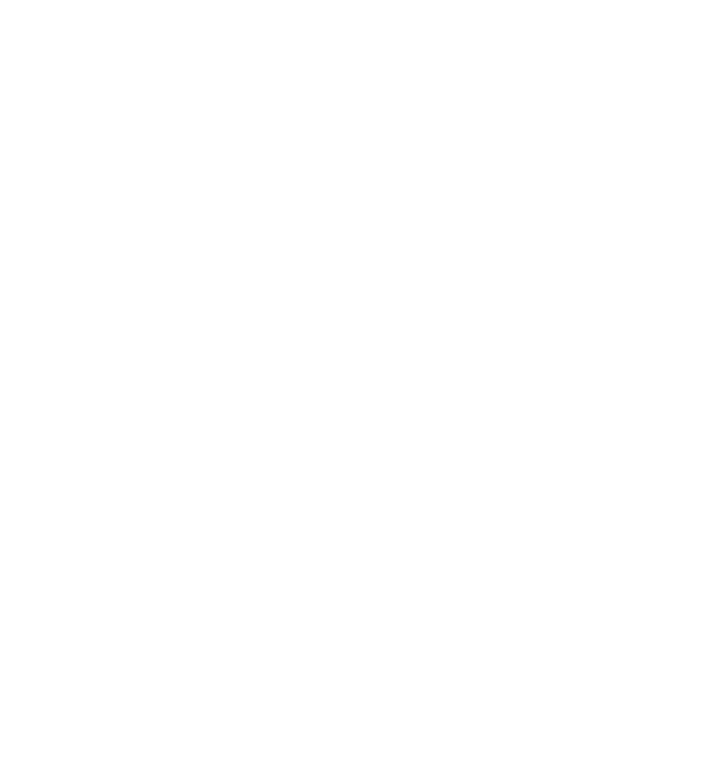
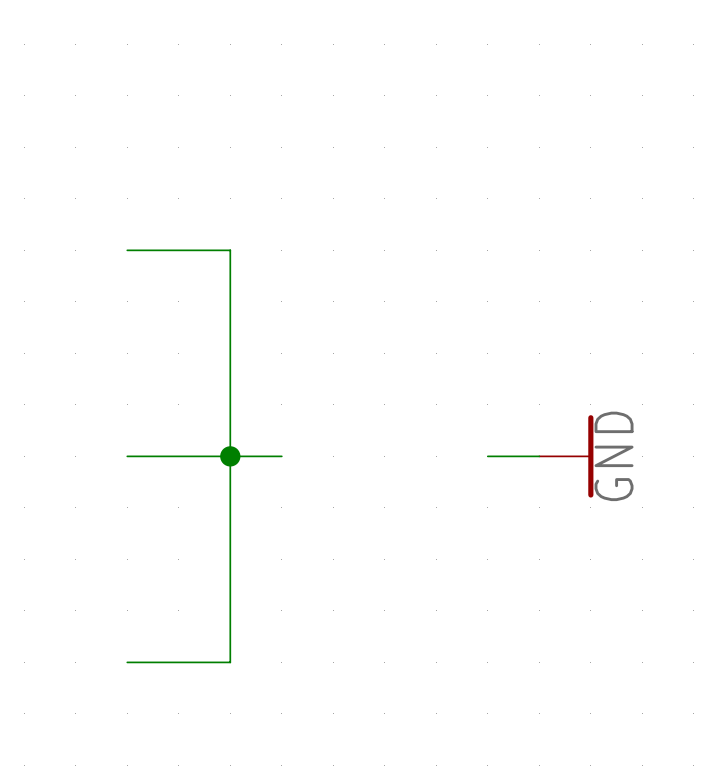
wire: none -> (127, 250) (230, 250) (230, 662) (127, 662)
wire: none -> (127, 456) (281, 456)
junction: none -> (230, 456)
wire: none -> (487, 456) (539, 456)
power symbol: none -> GND (566, 456)

